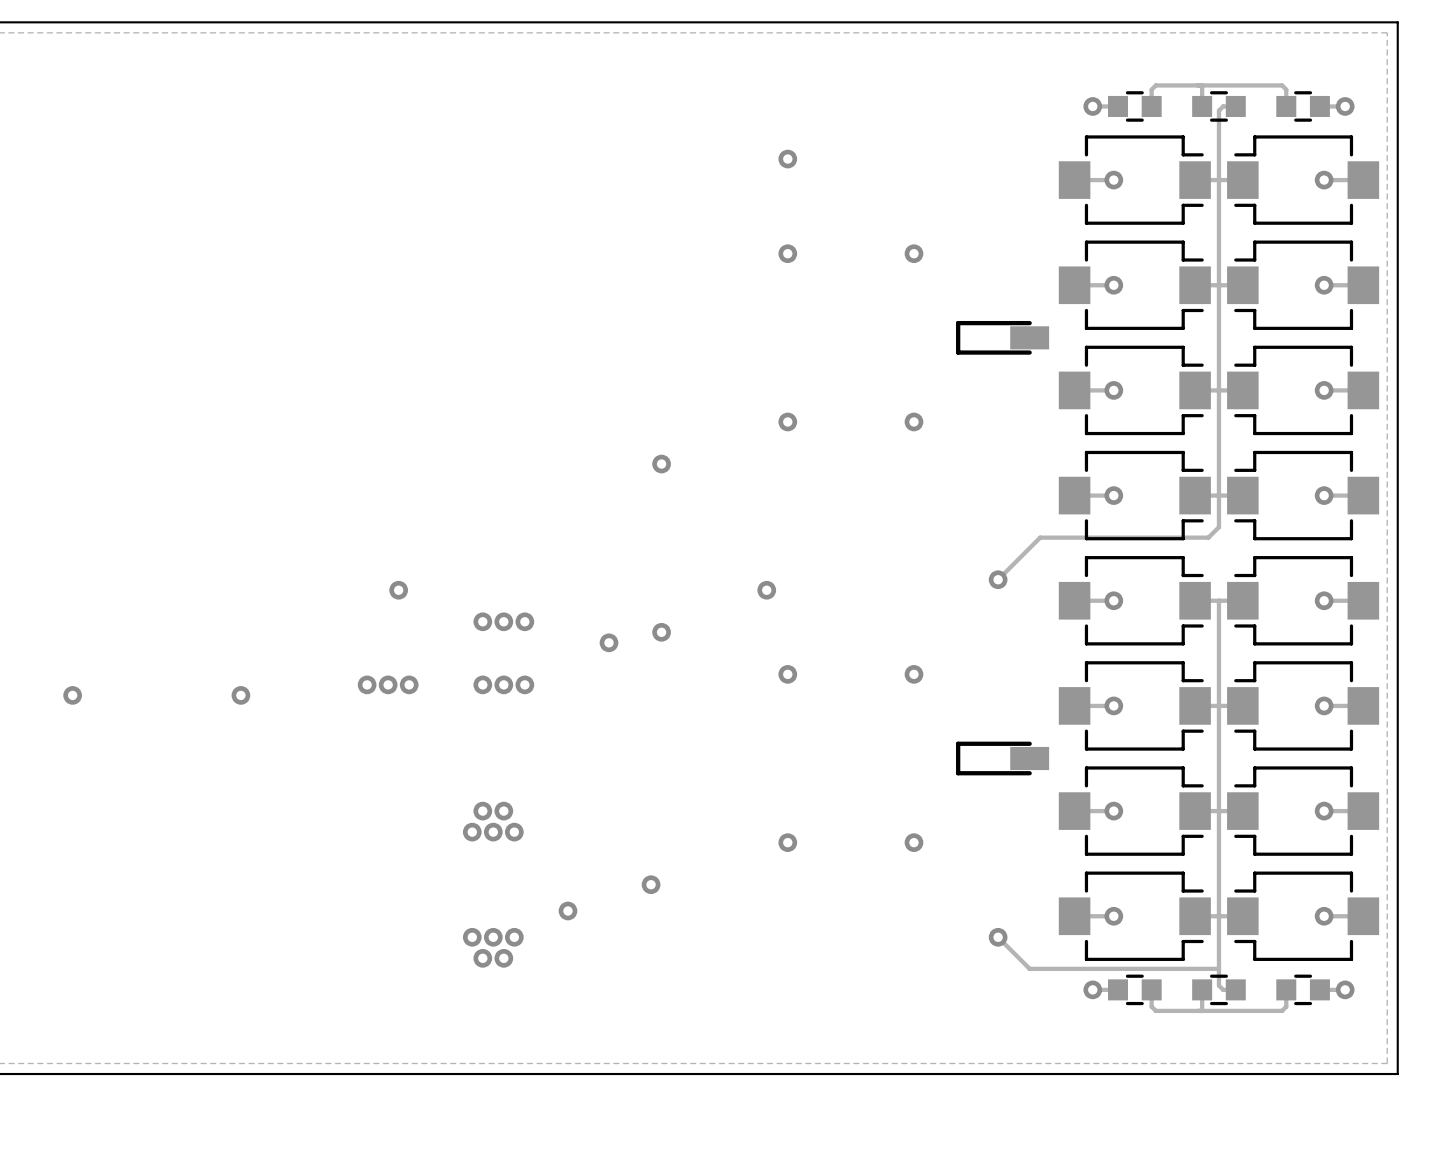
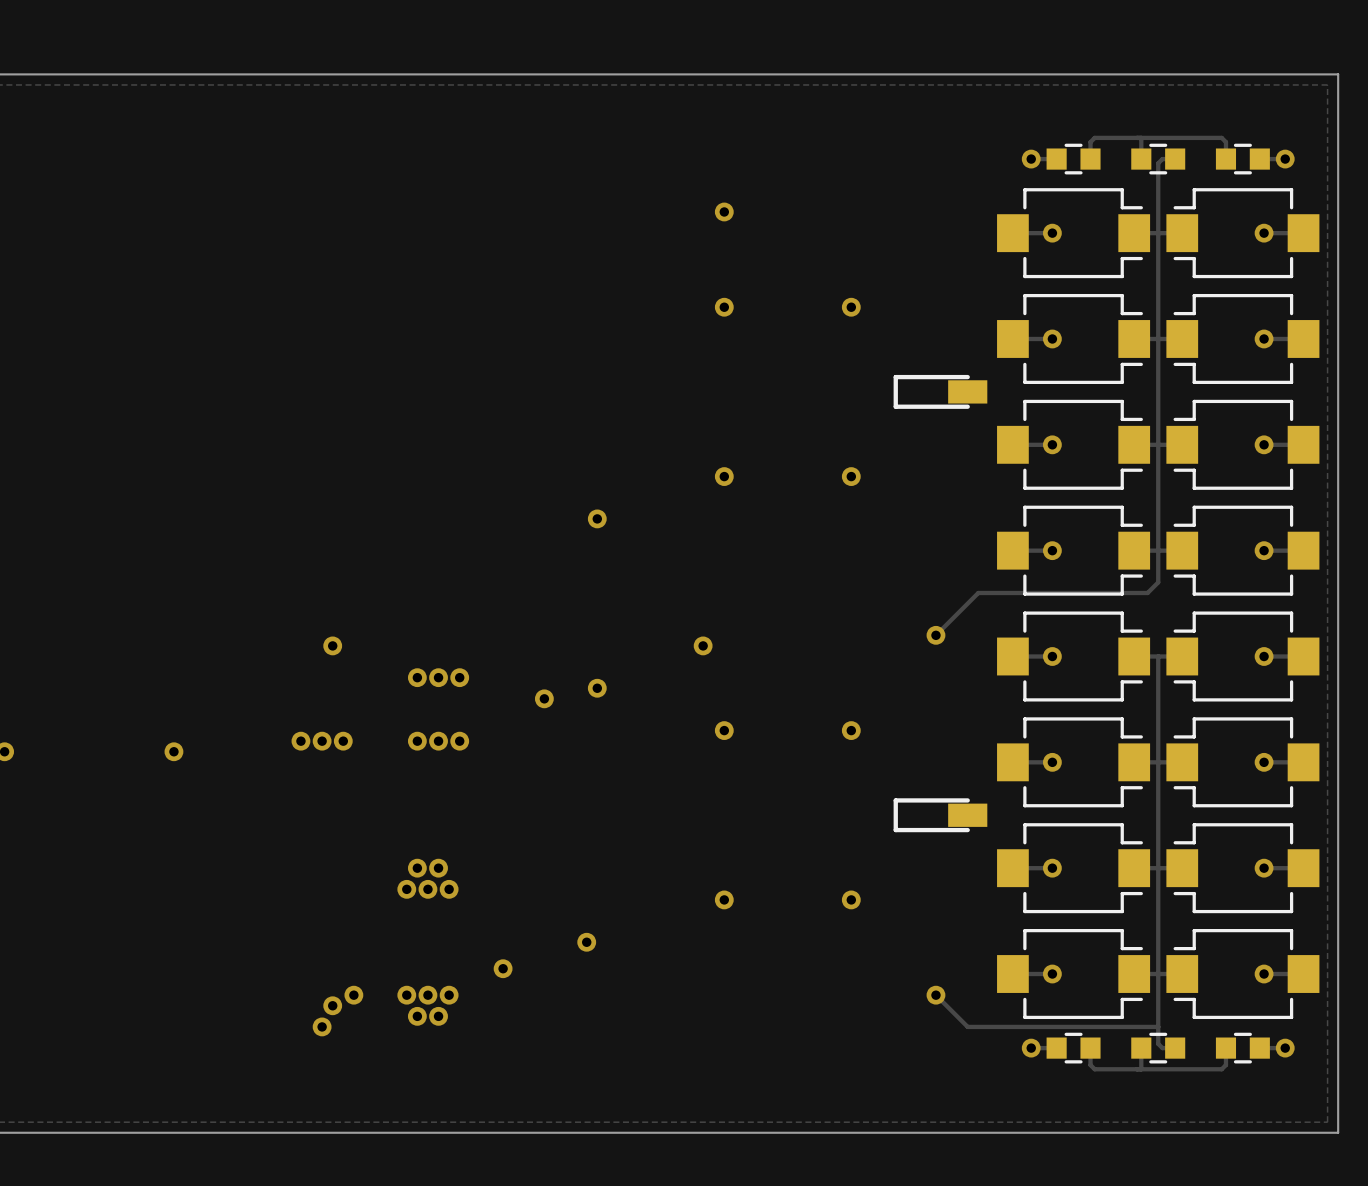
via: none -> (353, 995)
via: none -> (332, 1005)
via: none -> (322, 1026)

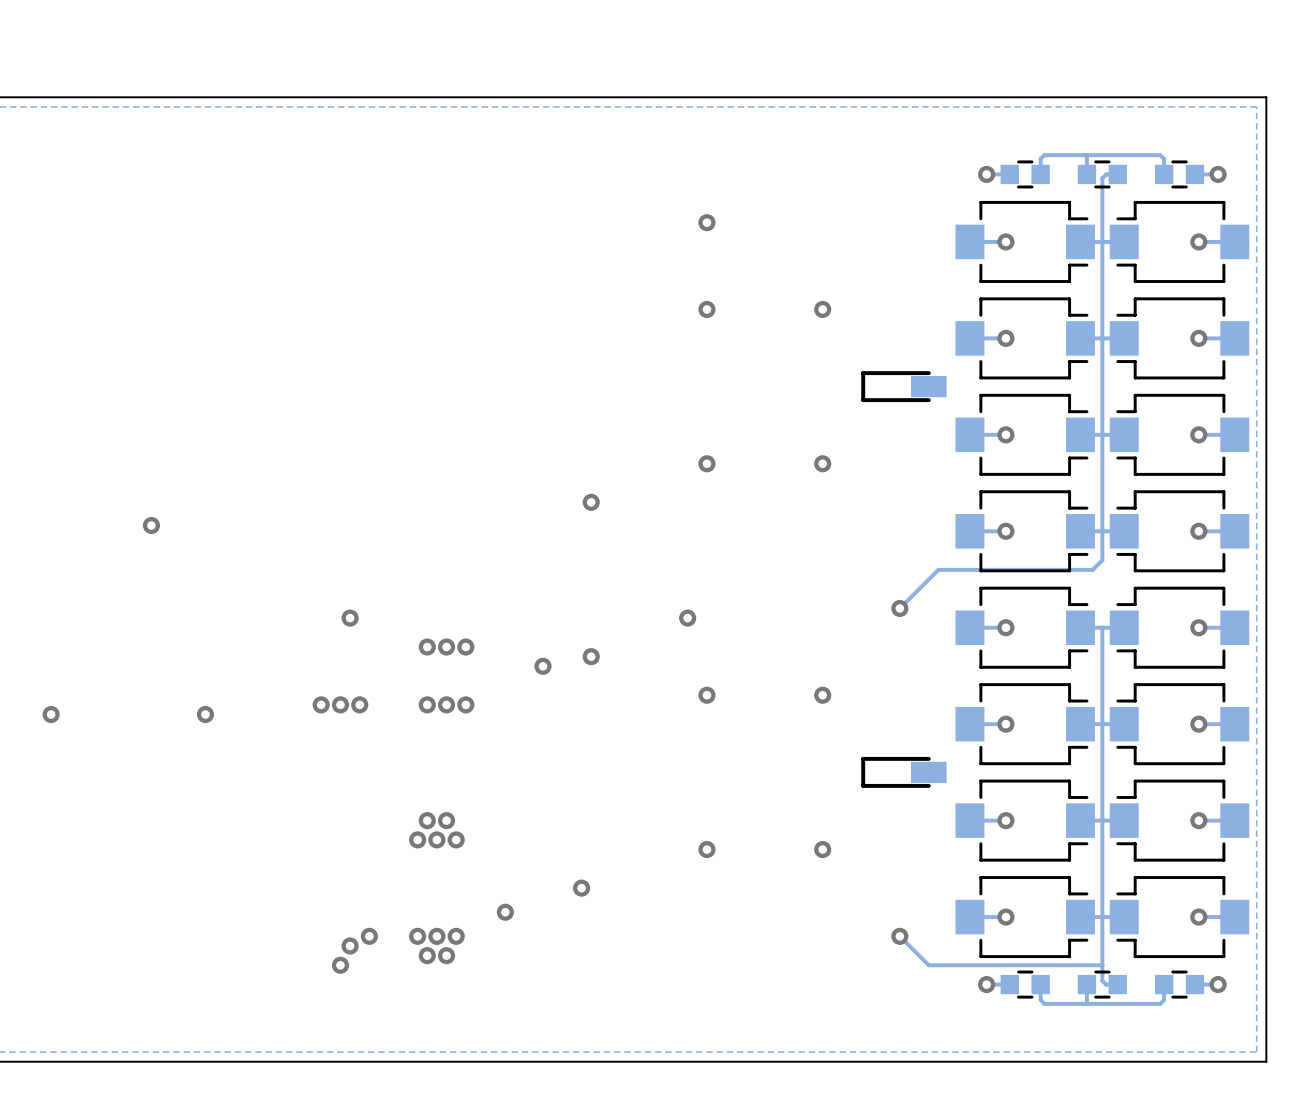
via: none -> (151, 525)

